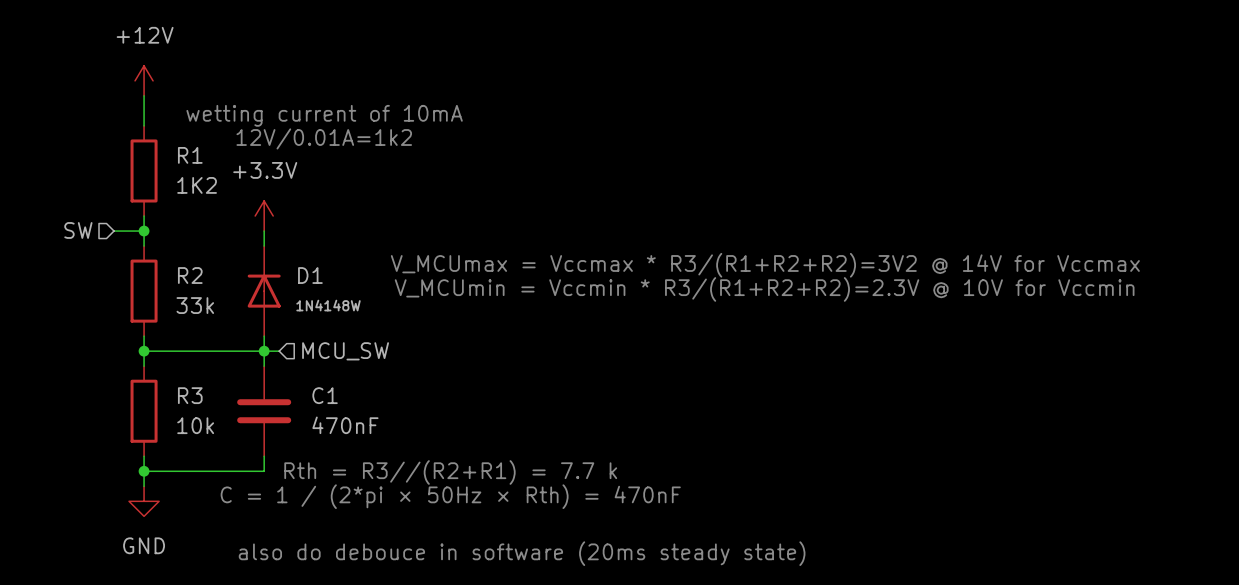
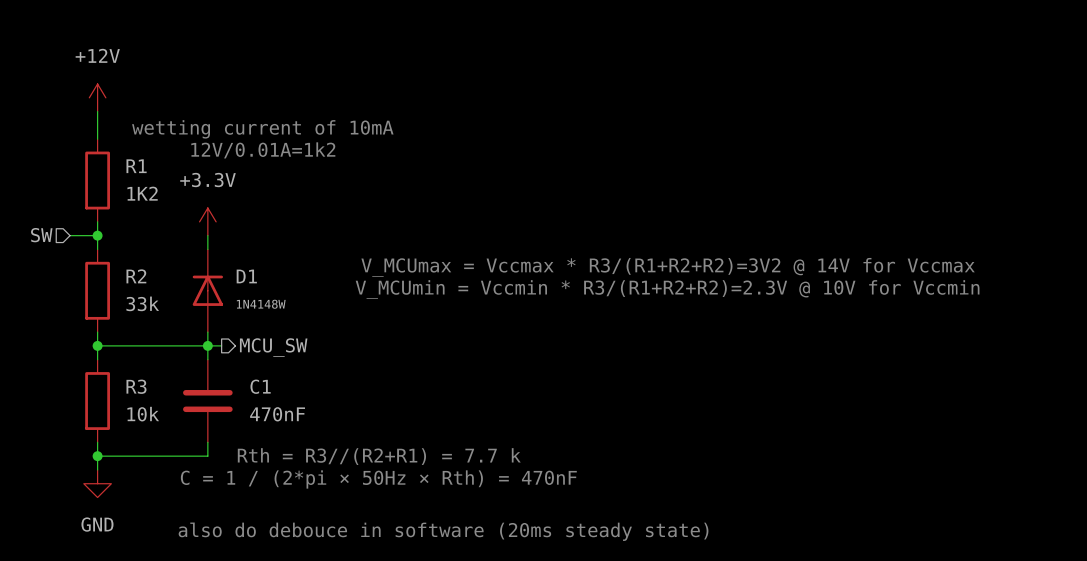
hierarchical label shape: input (345, 351) -> output (273, 347)

